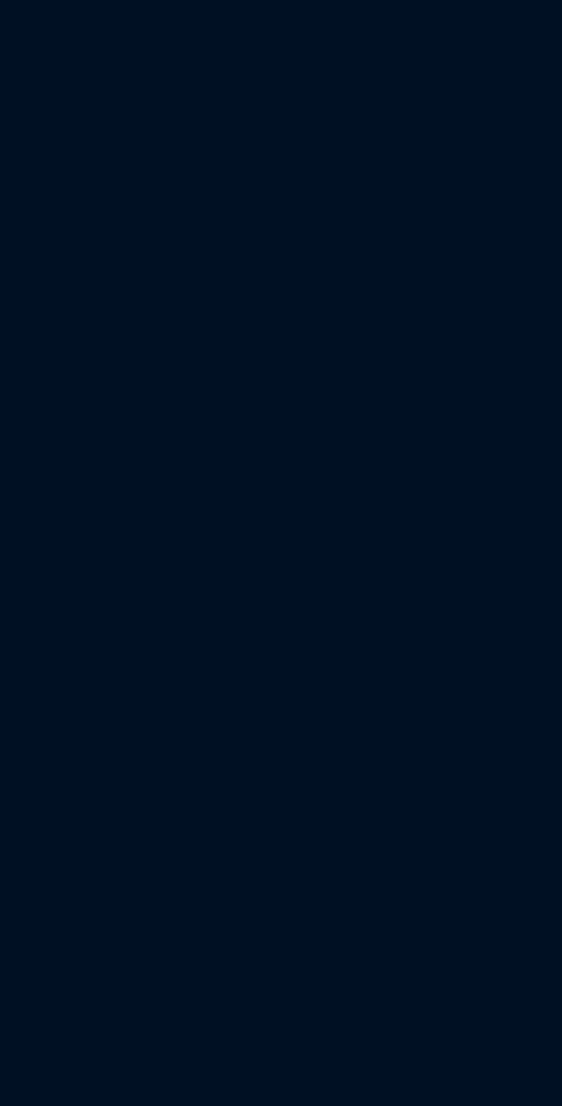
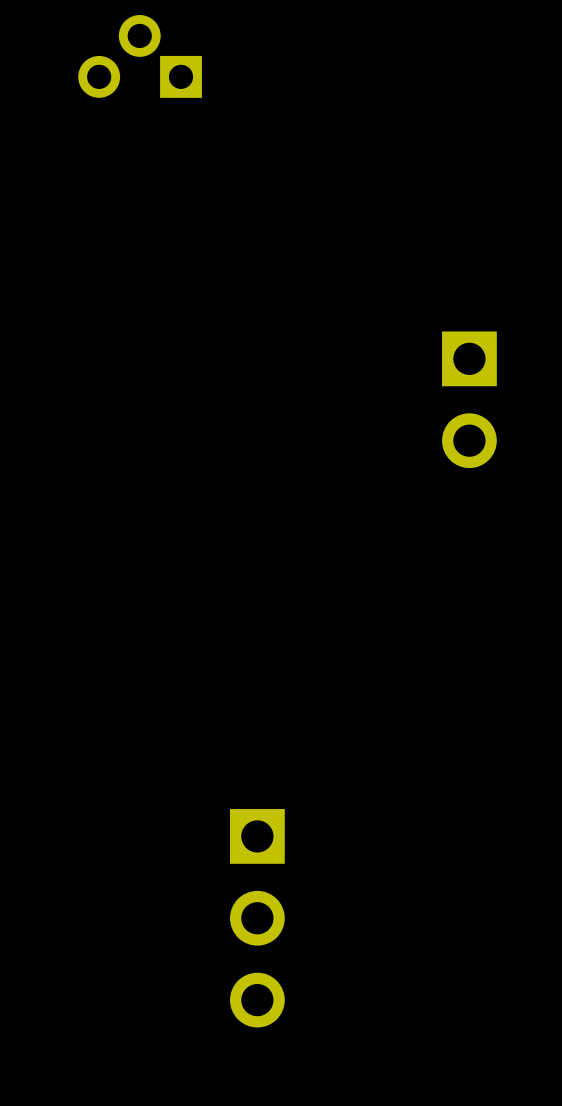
part: none -> (140, 56)
part: none -> (469, 399)
part: none -> (257, 918)

